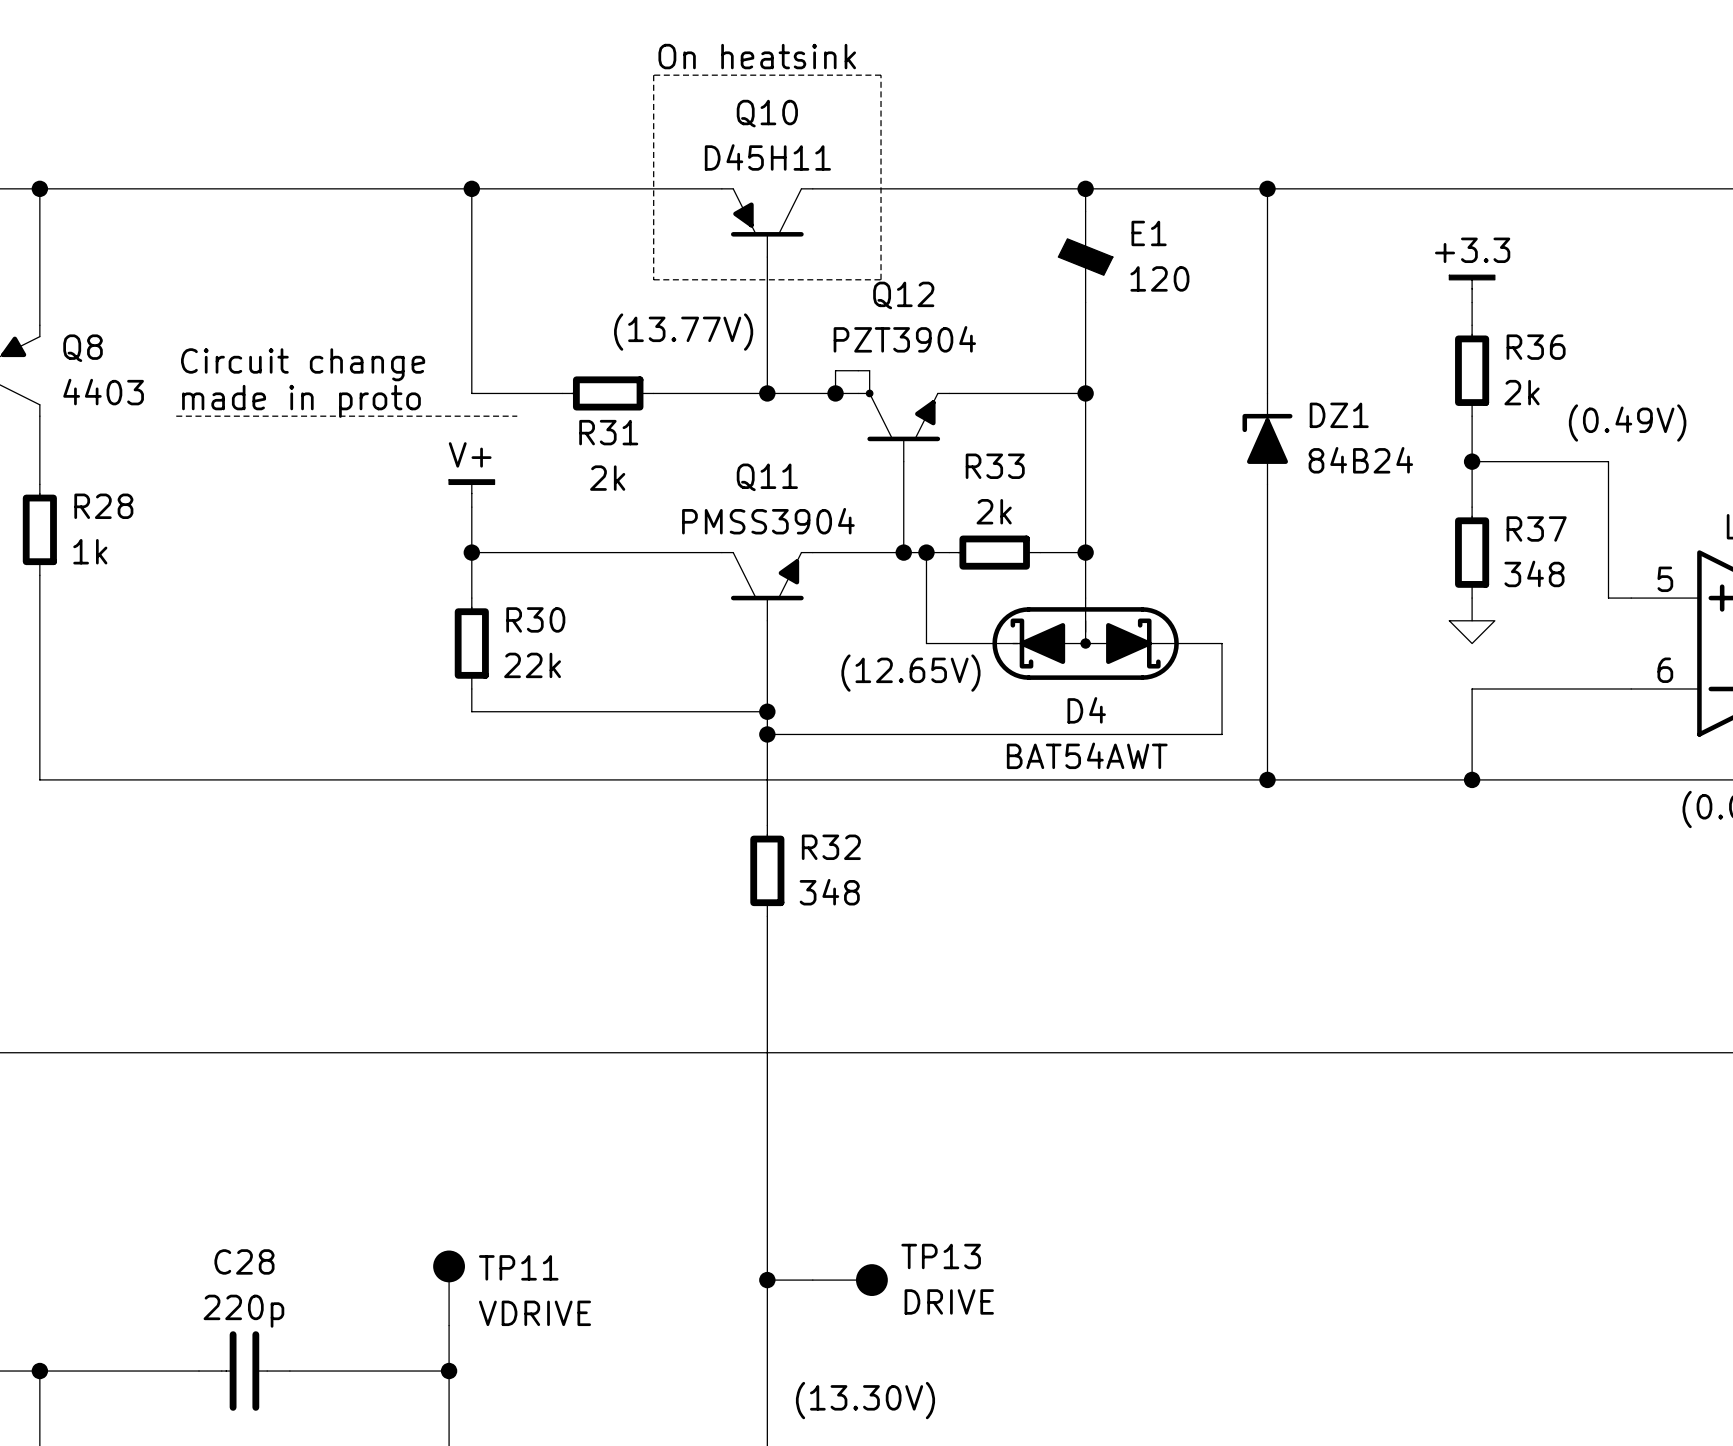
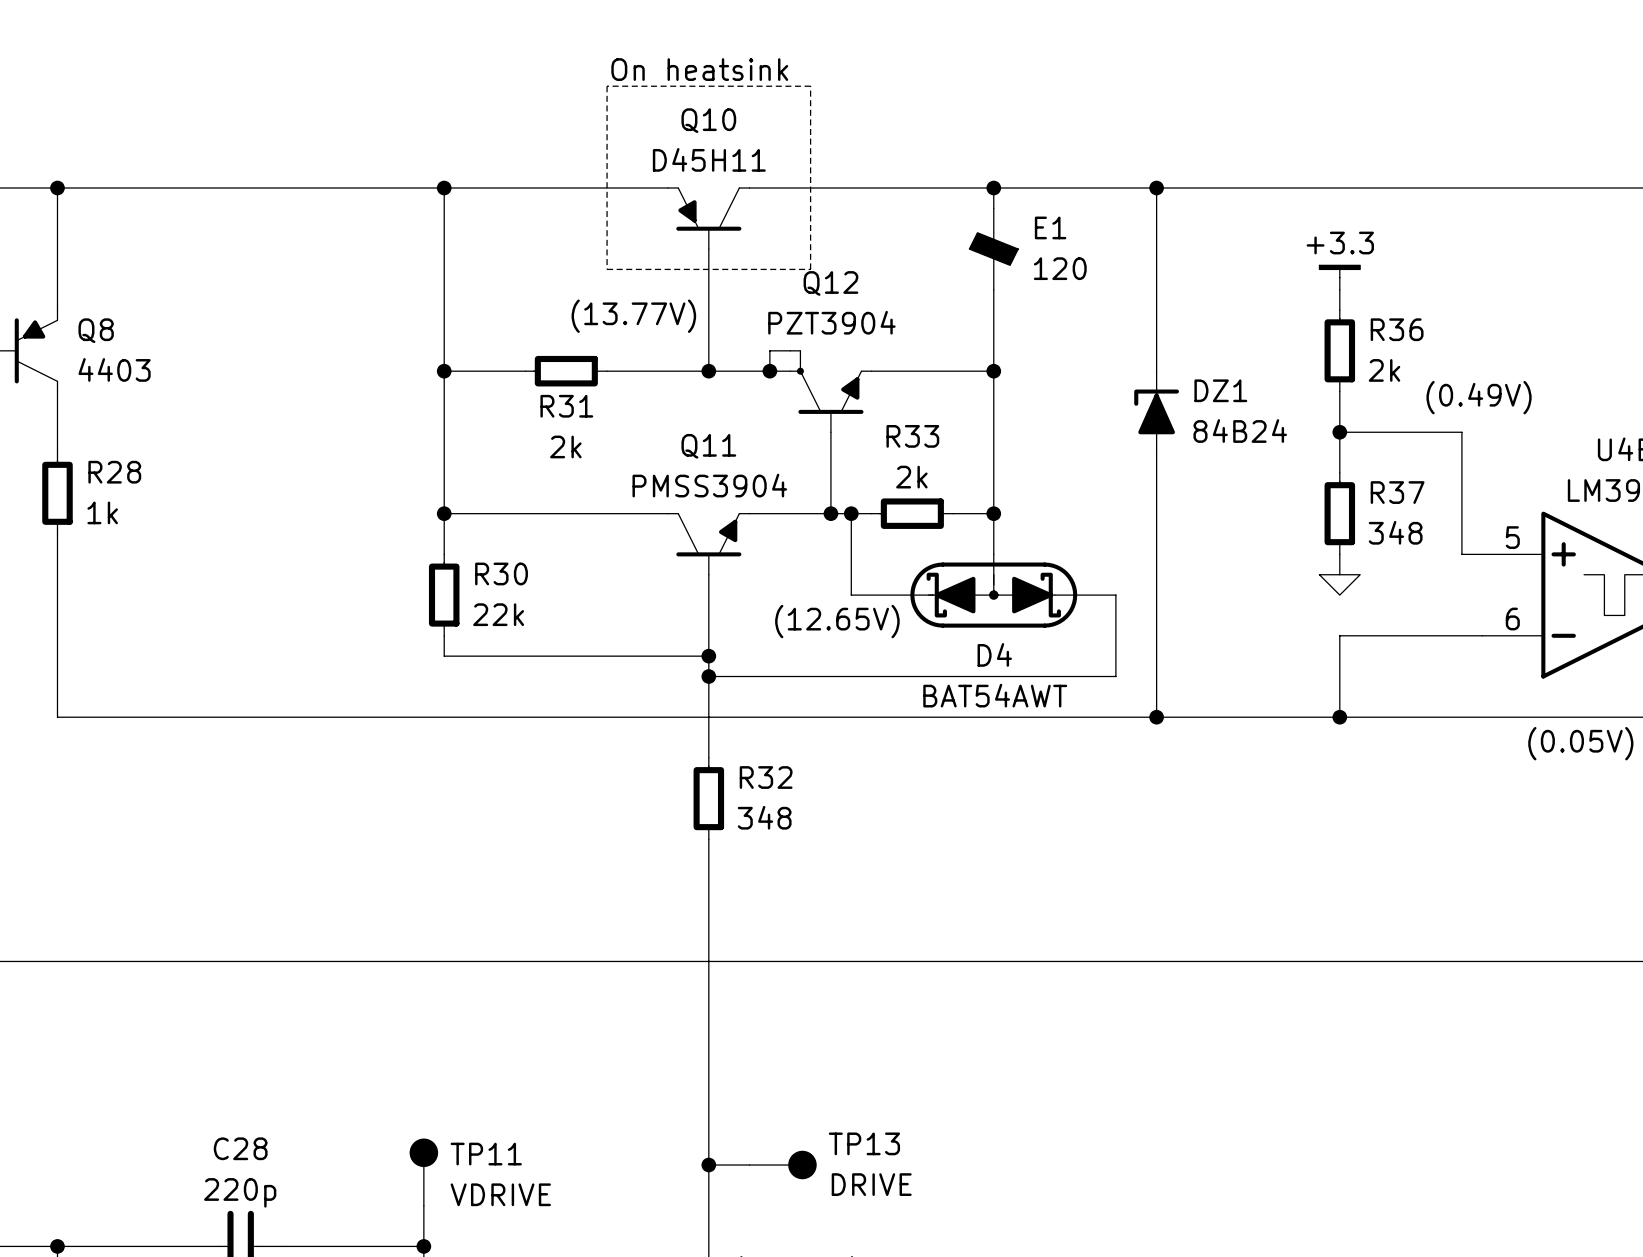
text: Circuit change (303, 364) -> none
wire: none -> (444, 371) (444, 472)
junction: none -> (444, 371)
text: made in proto (301, 401) -> none
line: (176, 416) (517, 416) -> none
power symbol: V+ (471, 493) -> none

